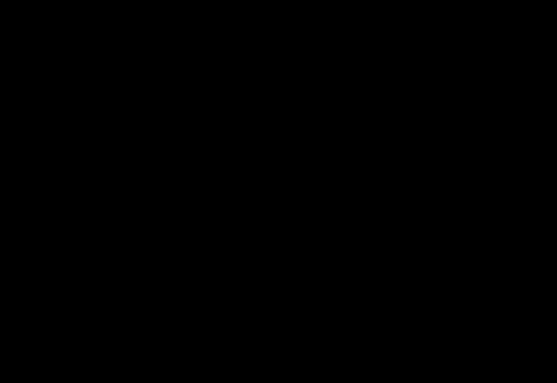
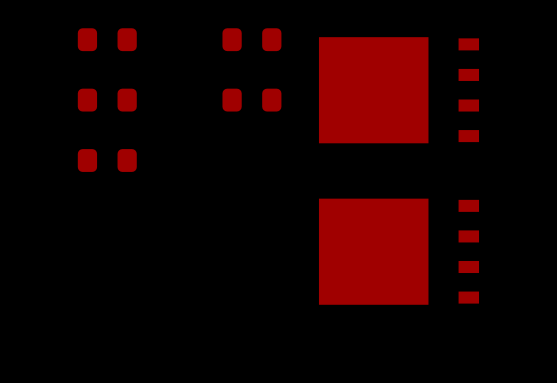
part: none -> (107, 39)
part: none -> (251, 39)
part: none -> (398, 90)
part: none -> (107, 100)
part: none -> (251, 100)
part: none -> (107, 160)
part: none -> (398, 251)

